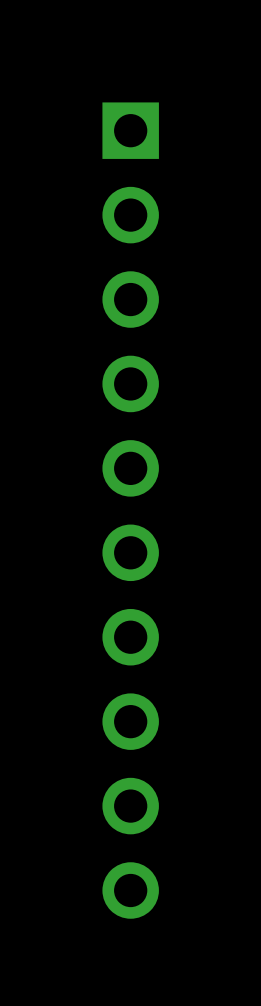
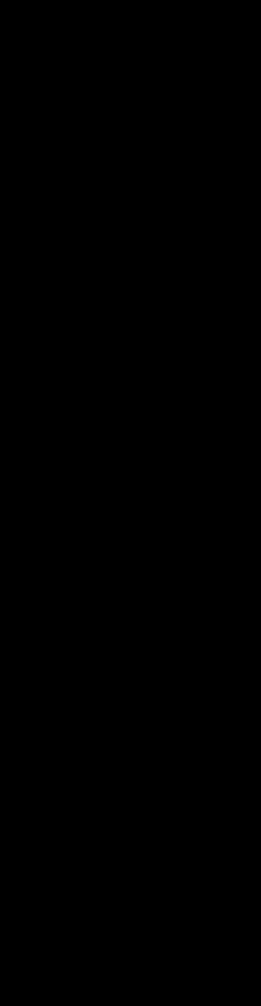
part: (130, 510) -> none

